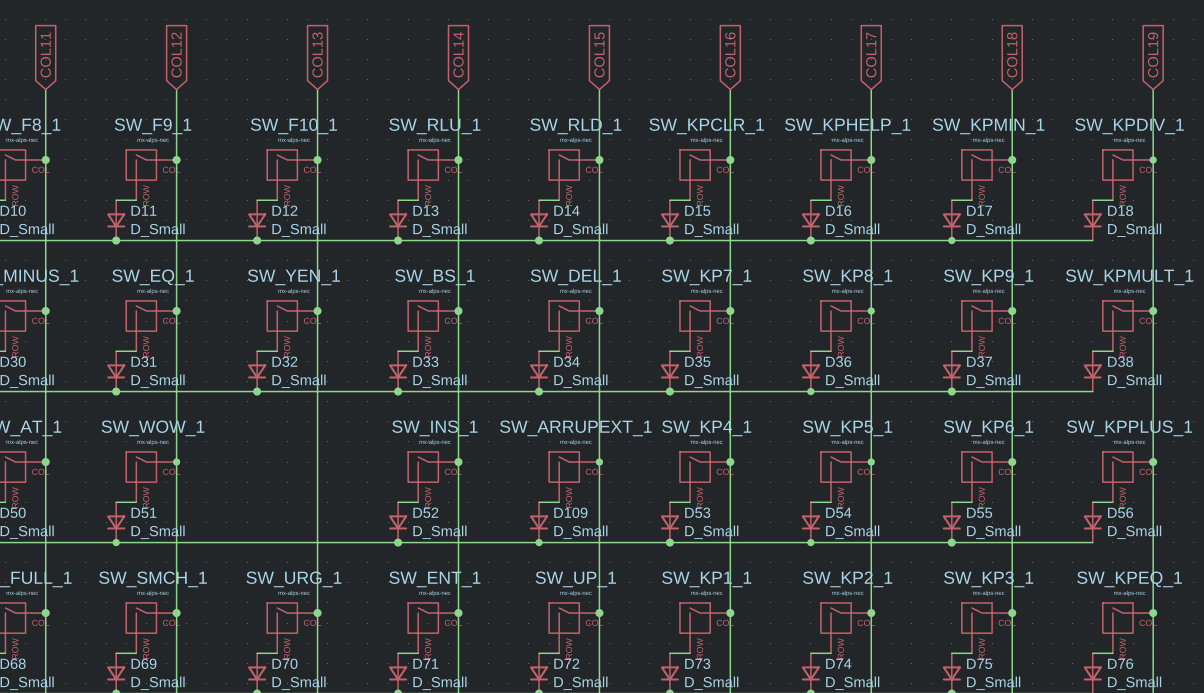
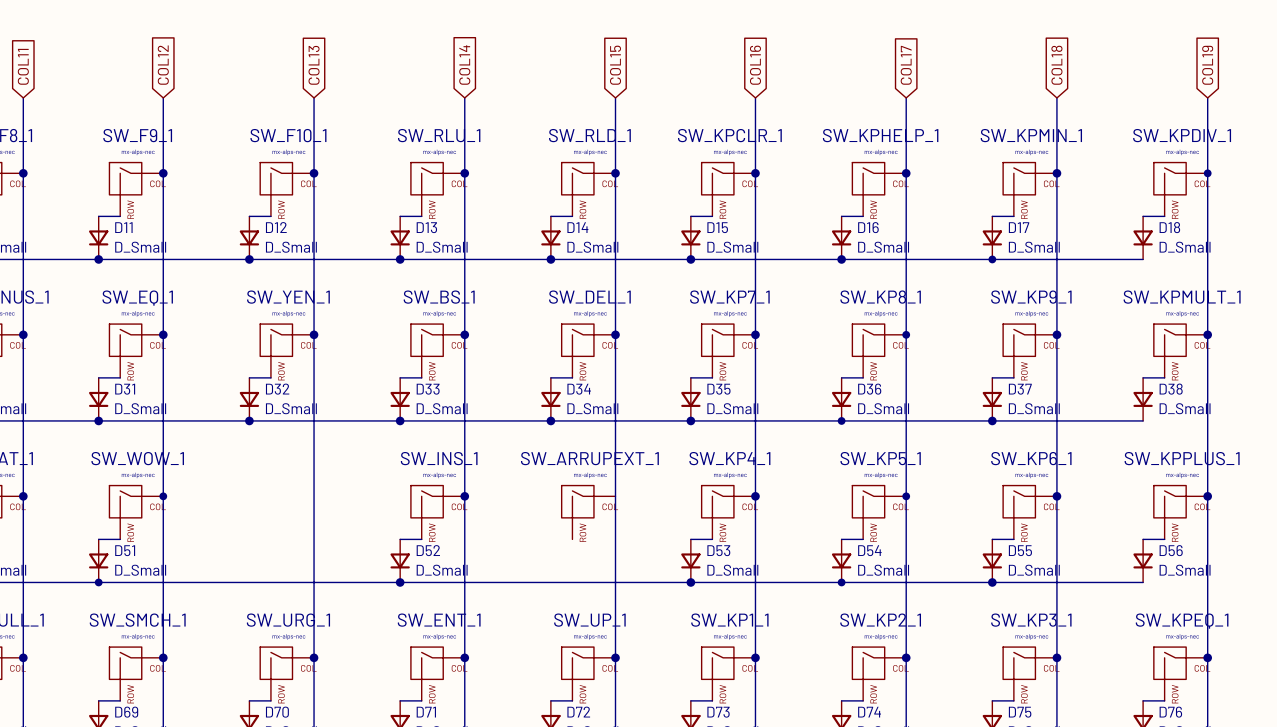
junction: (599, 462) -> none
wire: (539, 502) (559, 502) -> none
D109: D_Small (539, 522) -> none
junction: (539, 542) -> none

